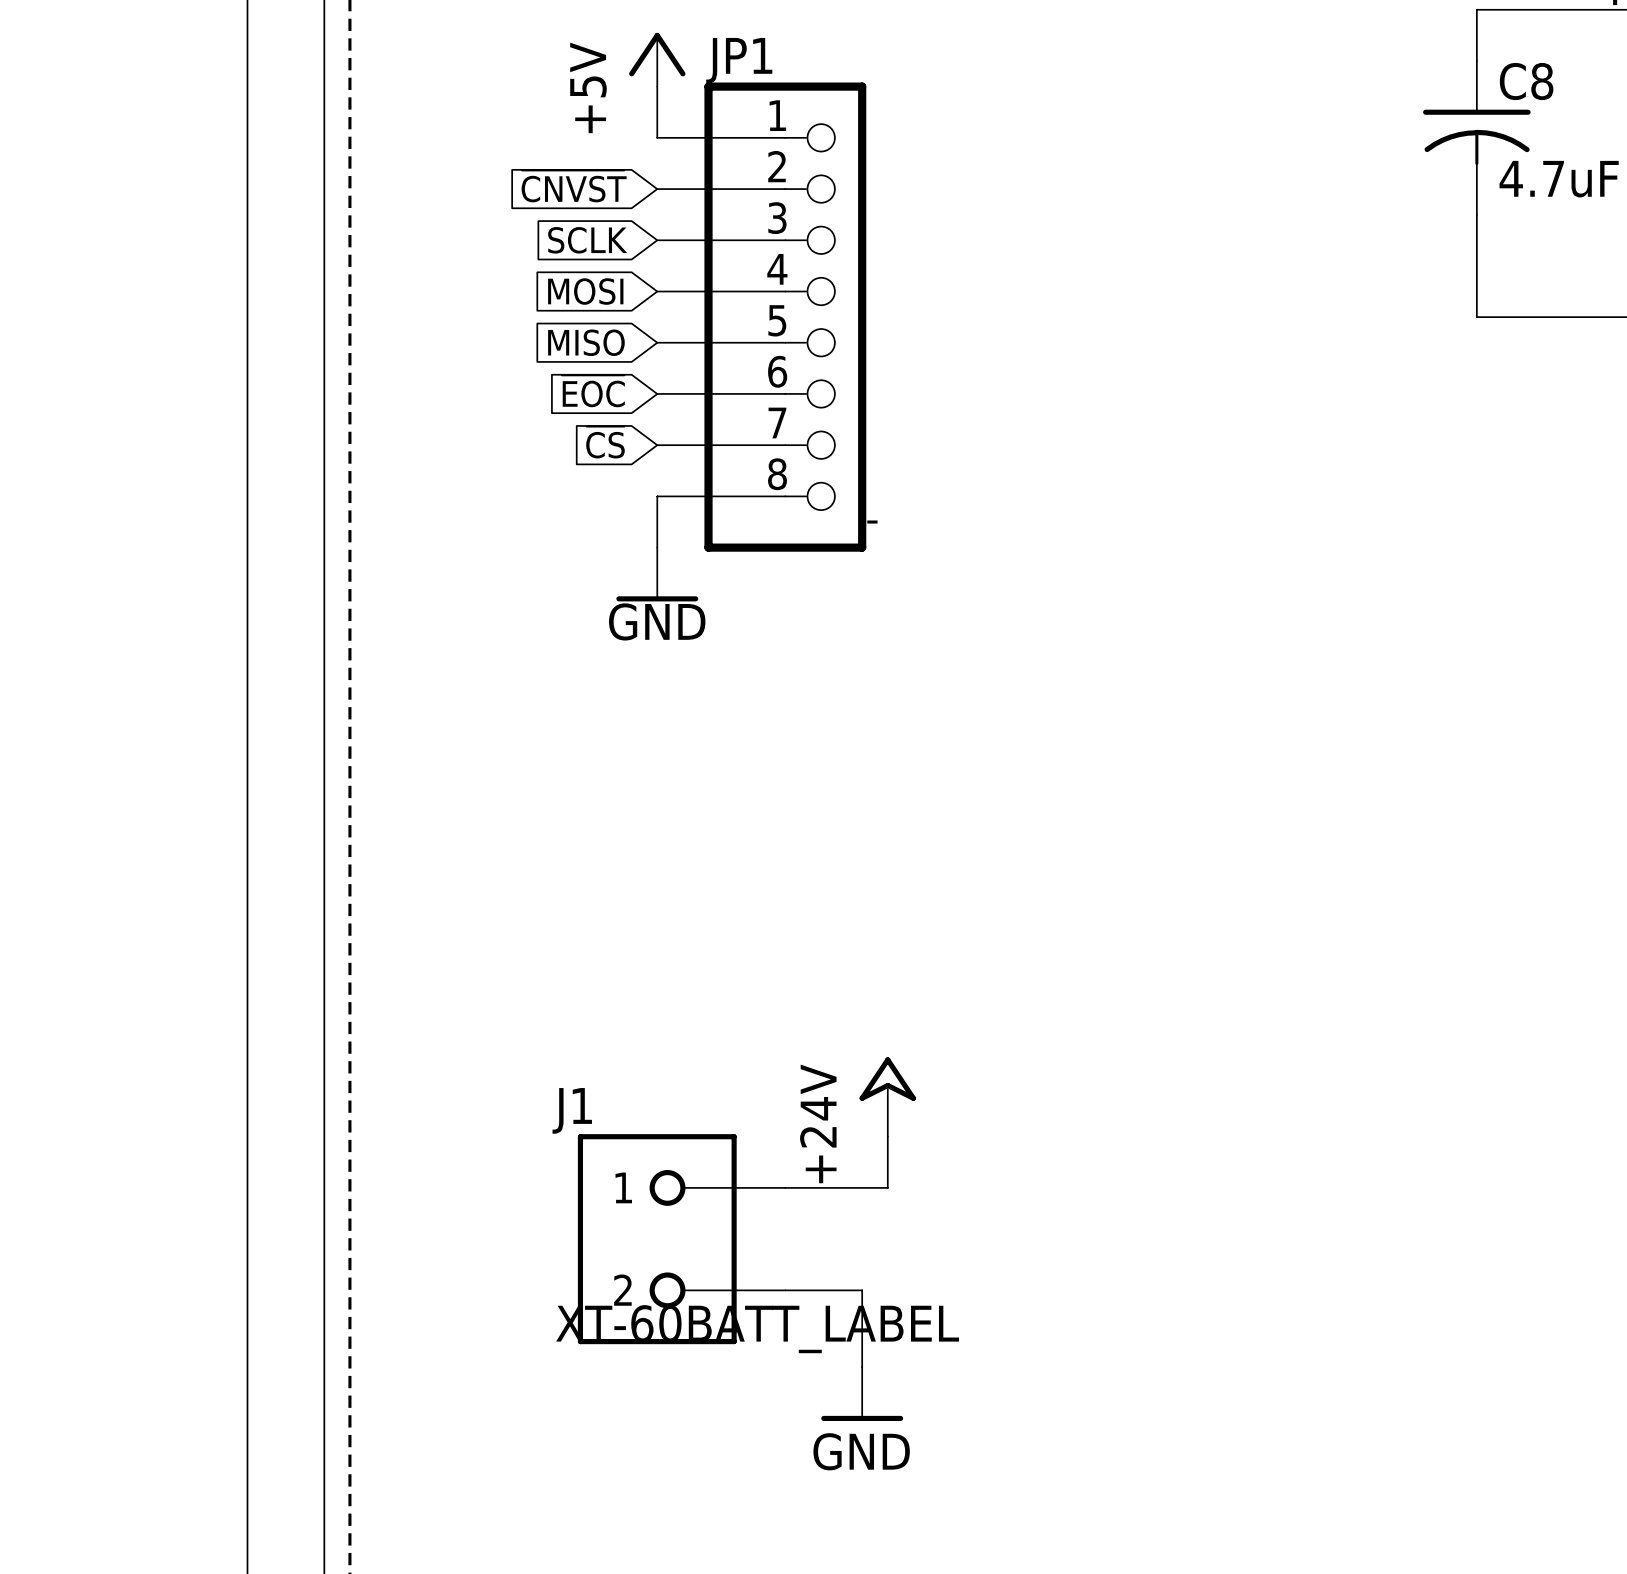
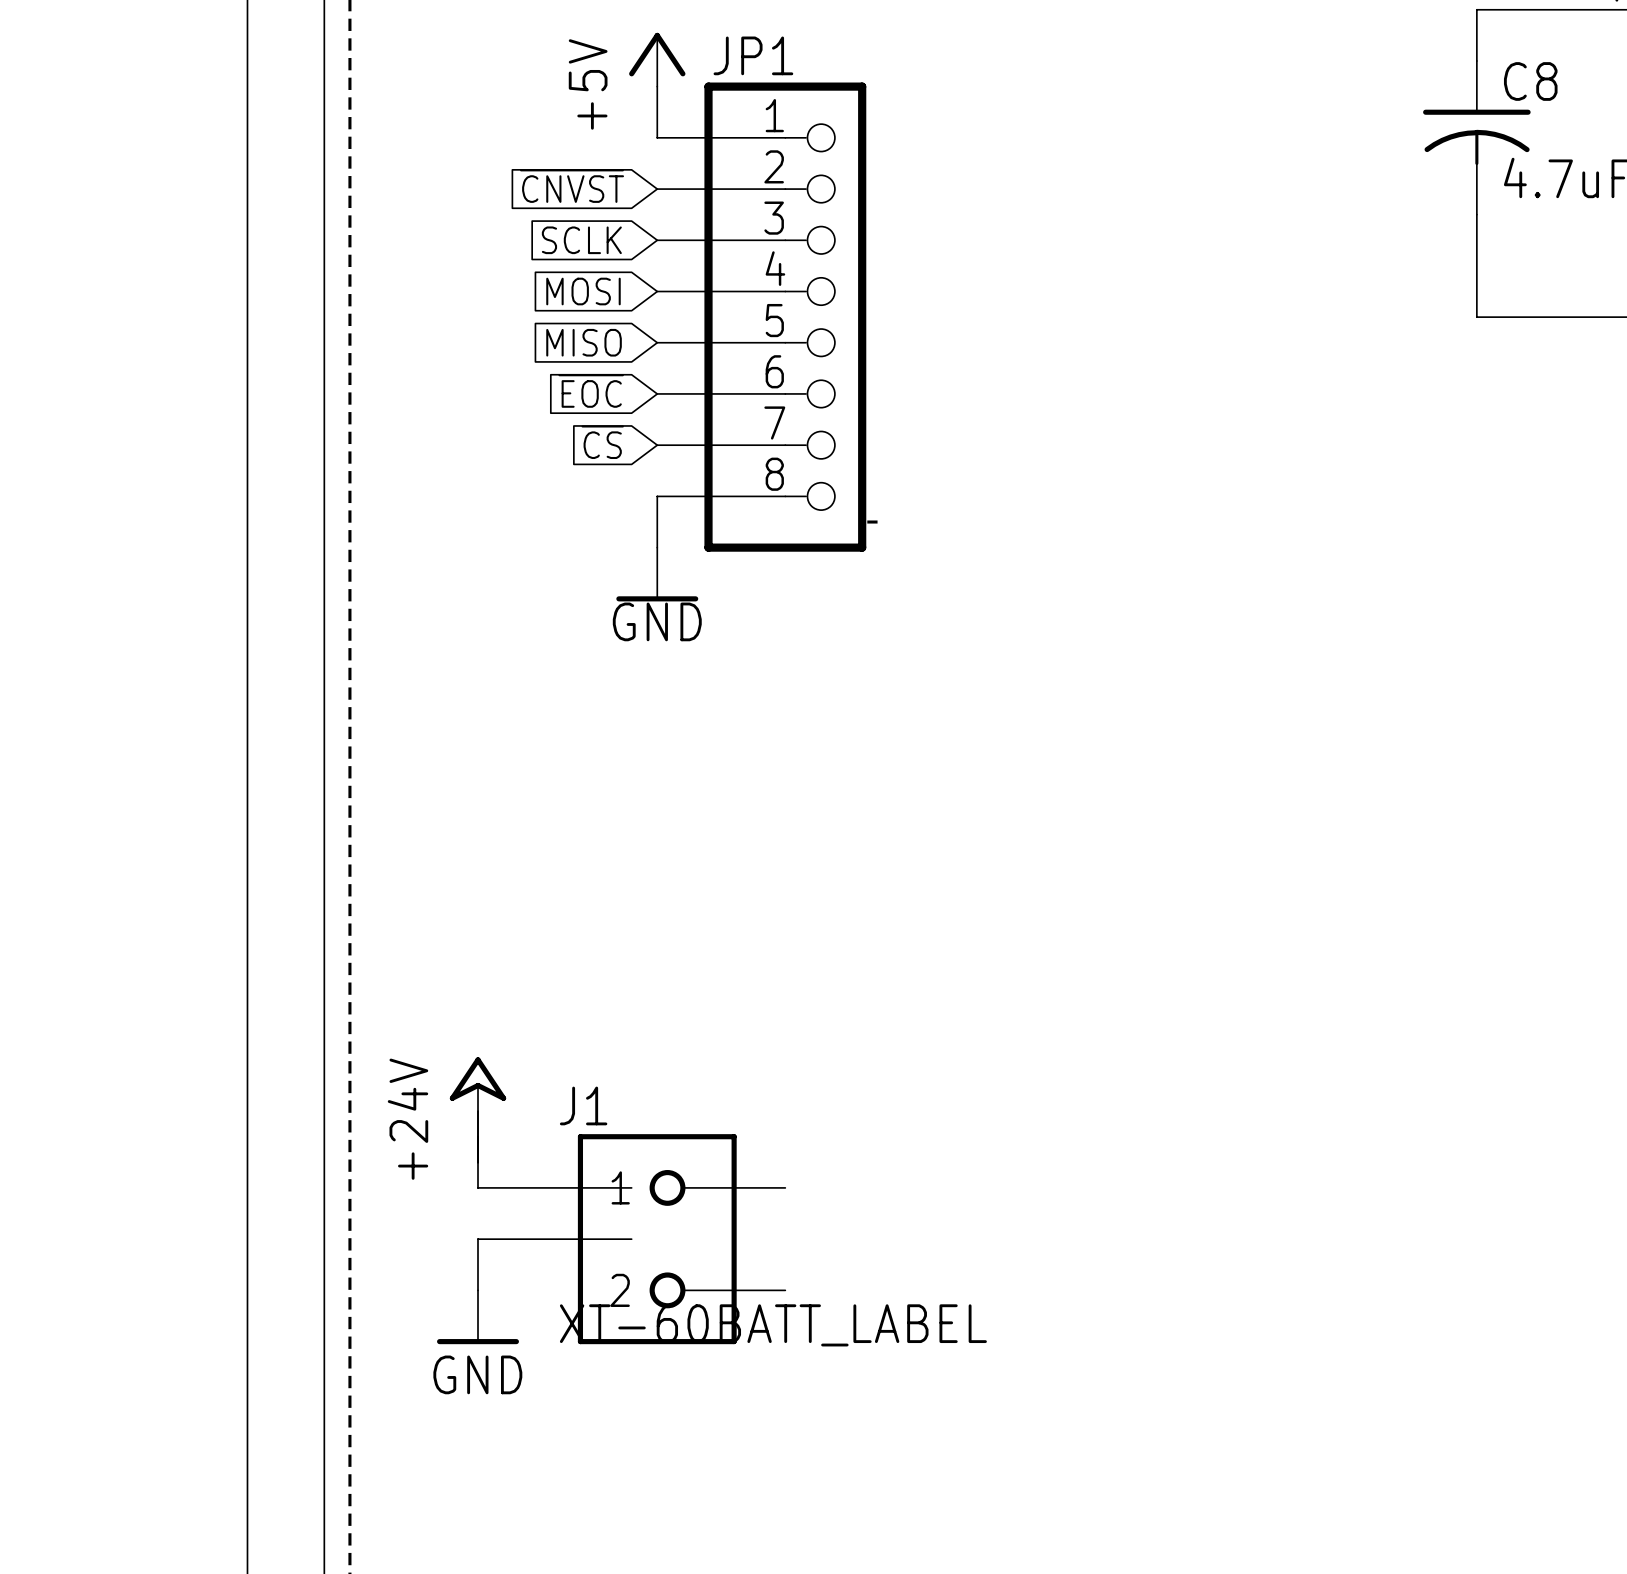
power symbol position: +24V (887, 1097) -> +24V (478, 1097)
wire: none -> (478, 1111) (478, 1187) (631, 1187)
wire: (887, 1136) (887, 1187) (785, 1187) -> none
wire: none -> (631, 1239) (478, 1239) (478, 1290)
wire: (785, 1290) (862, 1290) (862, 1367) -> none
power symbol position: GND (862, 1394) -> GND (478, 1317)

